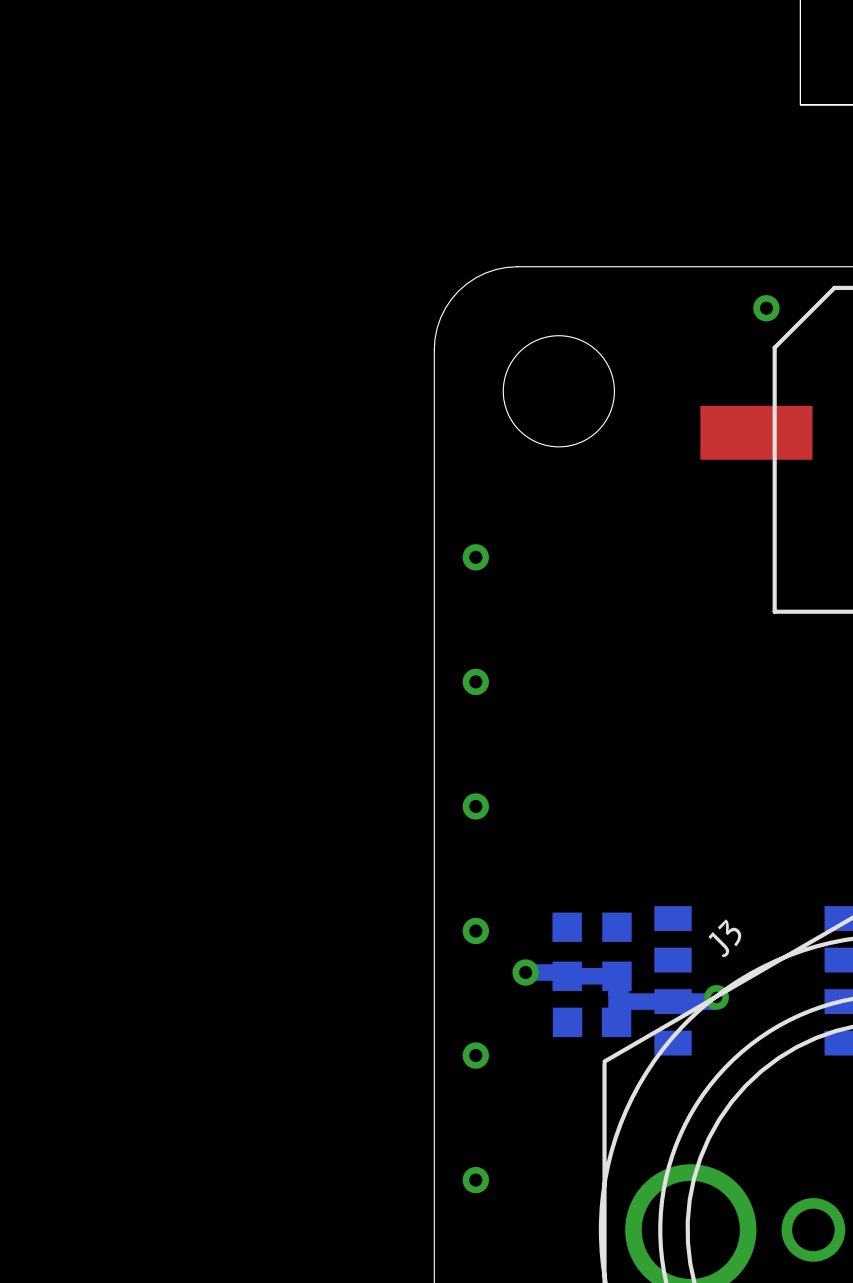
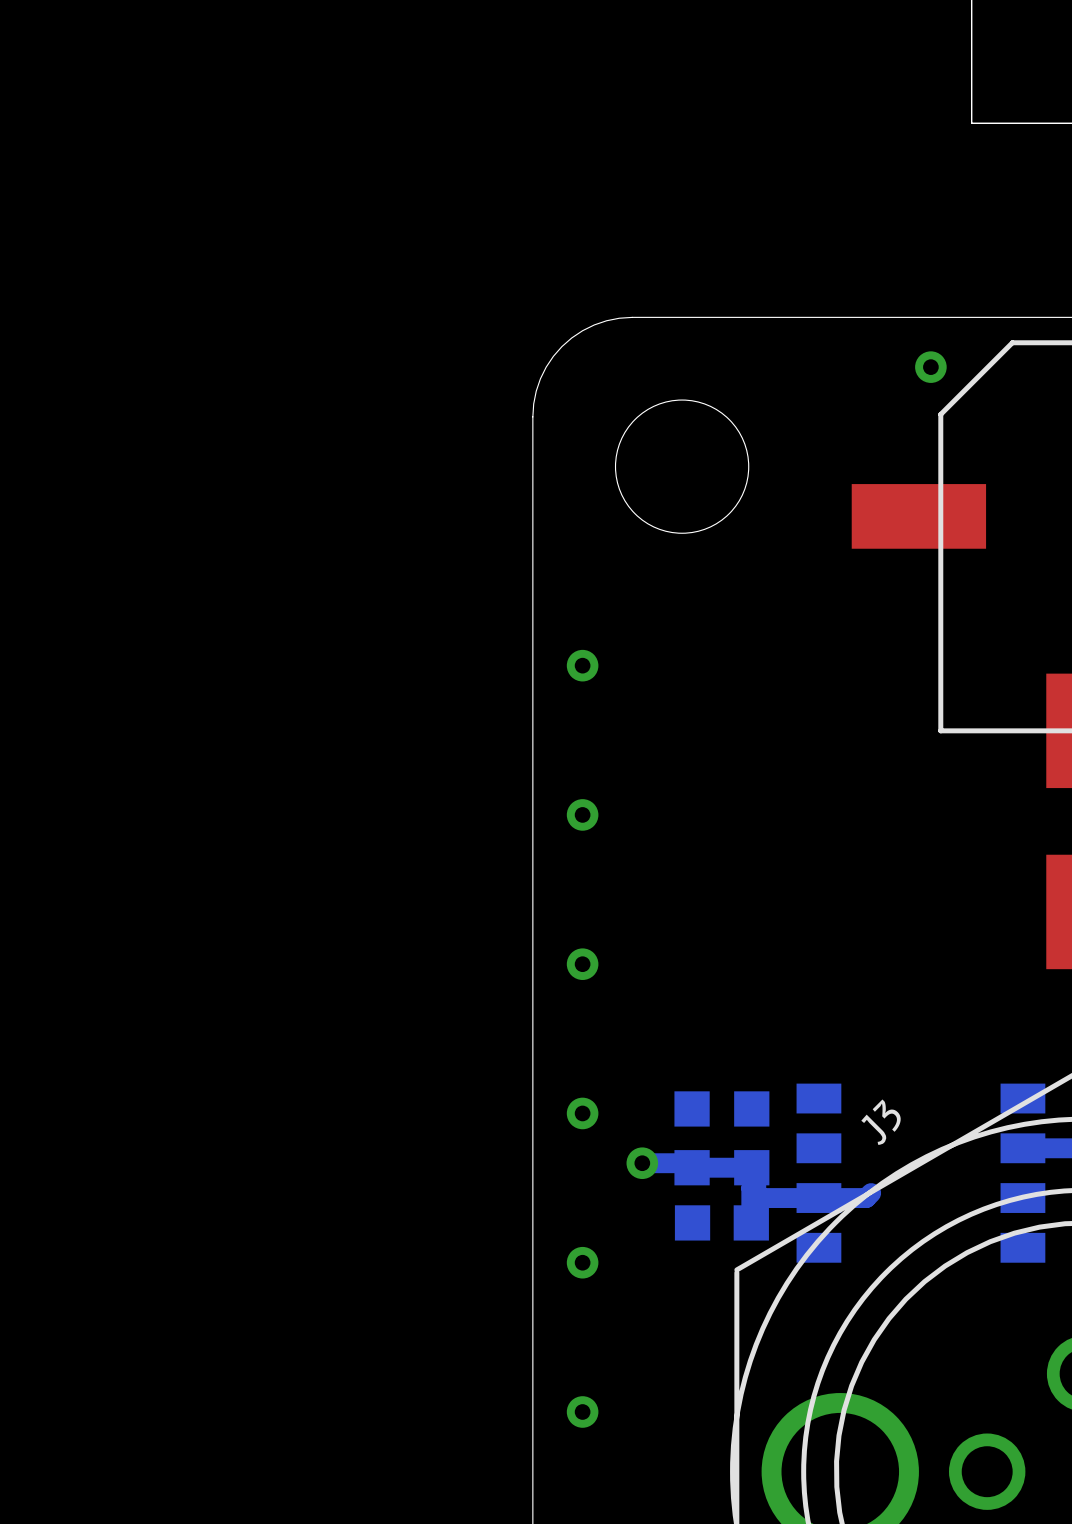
via: (716, 997) -> none

